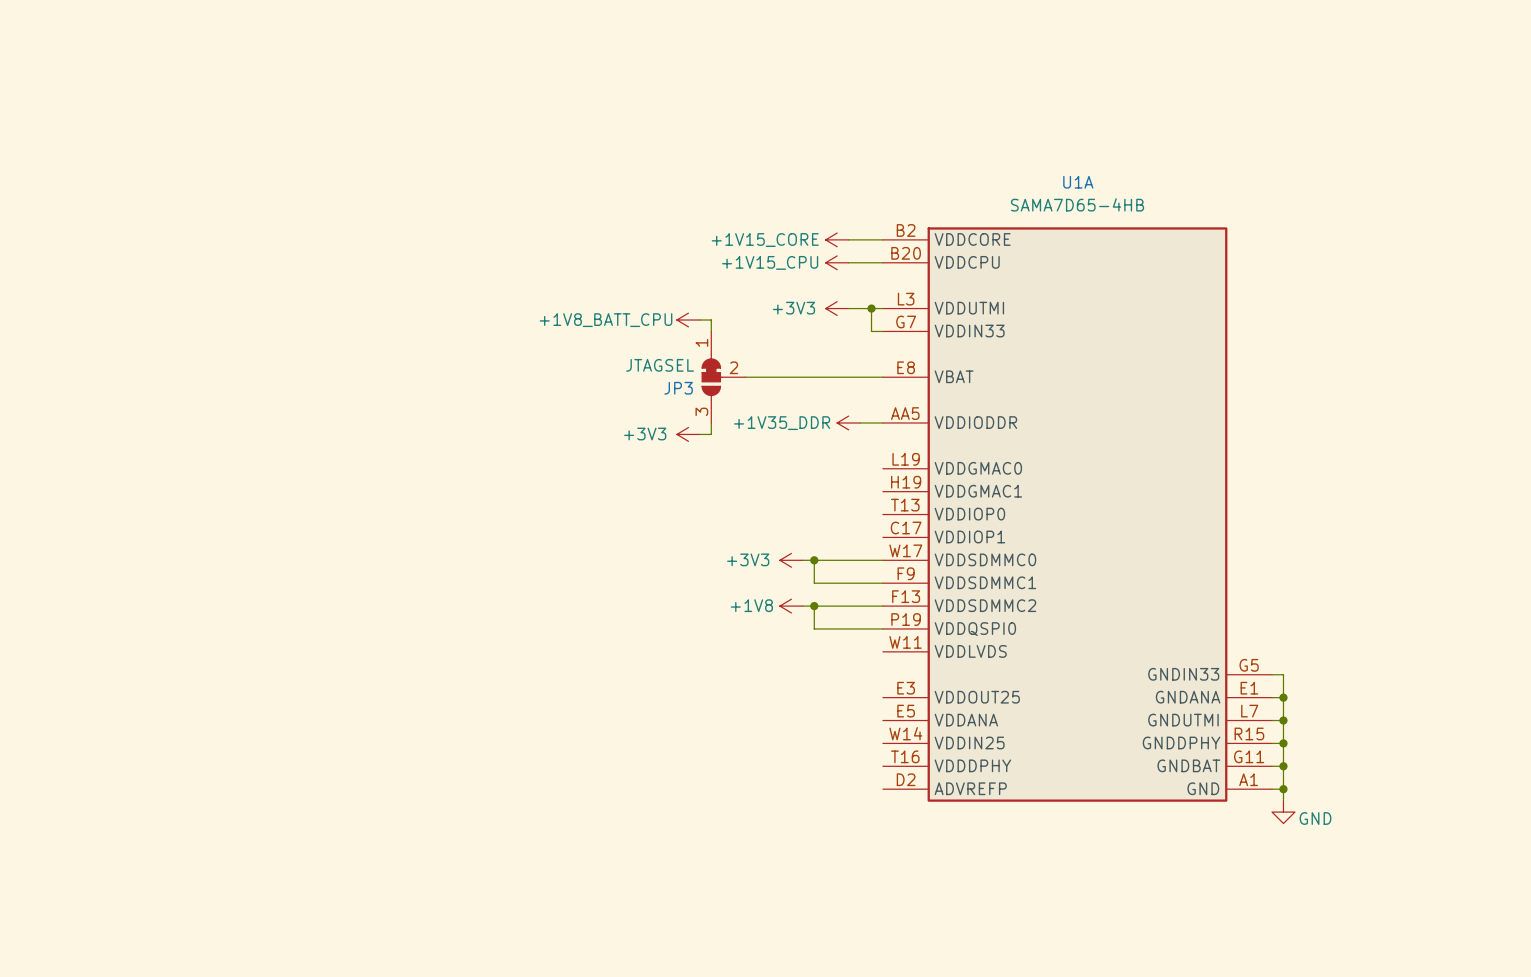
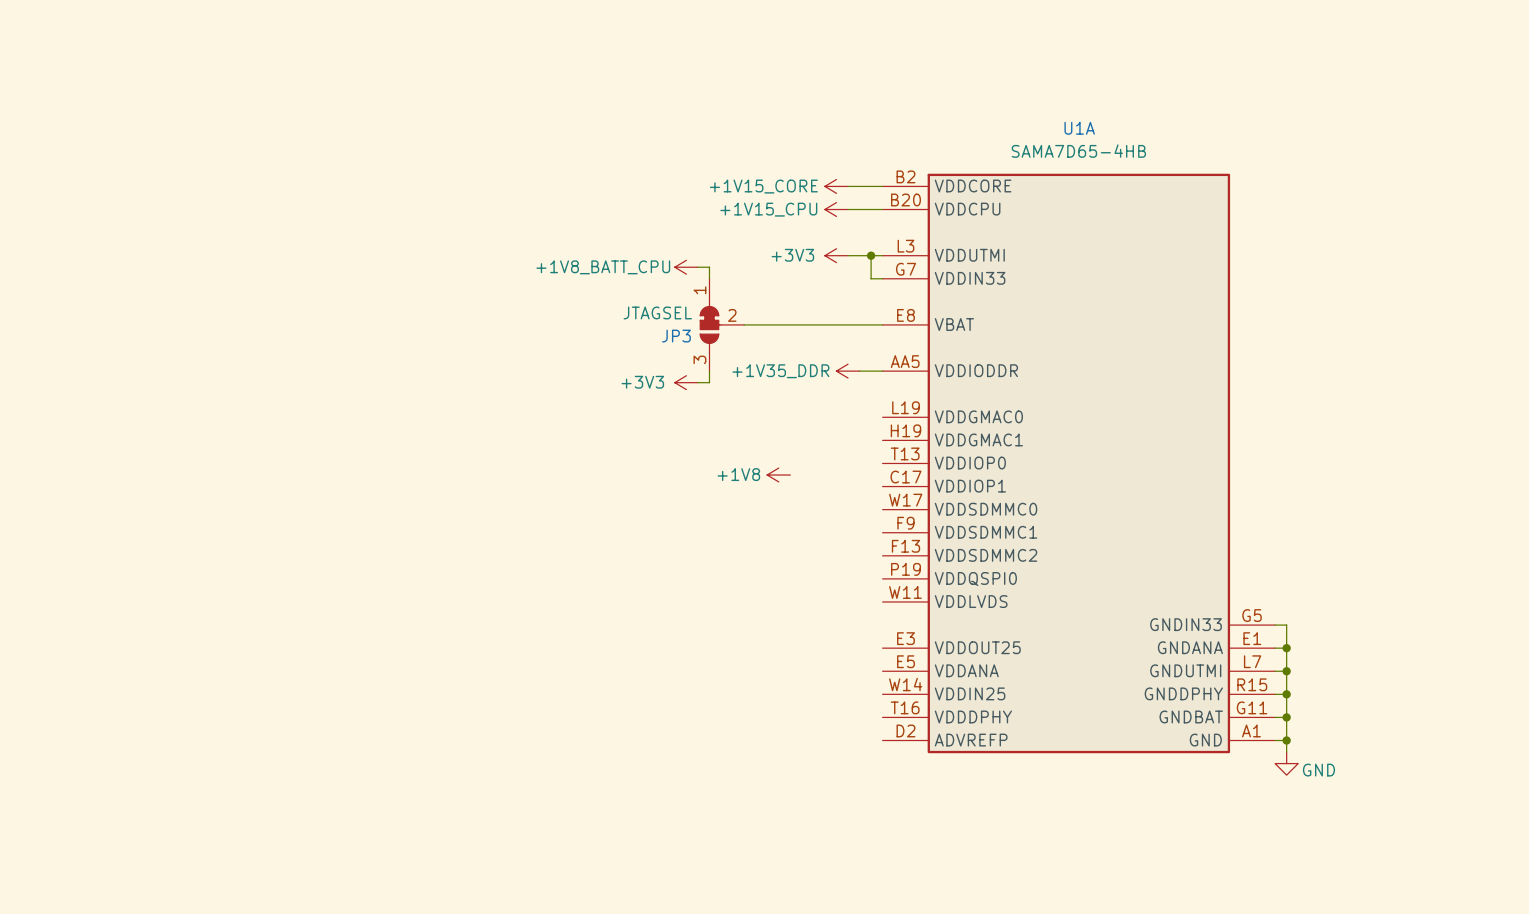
power symbol: +3V3 (791, 560) -> none
wire: (802, 560) (882, 560) -> none
wire: (814, 560) (814, 583) (882, 583) -> none
junction: (814, 560) -> none
power symbol position: +1V8 (791, 606) -> +1V8 (778, 475)
wire: (802, 606) (882, 606) -> none
wire: (814, 606) (814, 628) (882, 628) -> none
junction: (814, 606) -> none

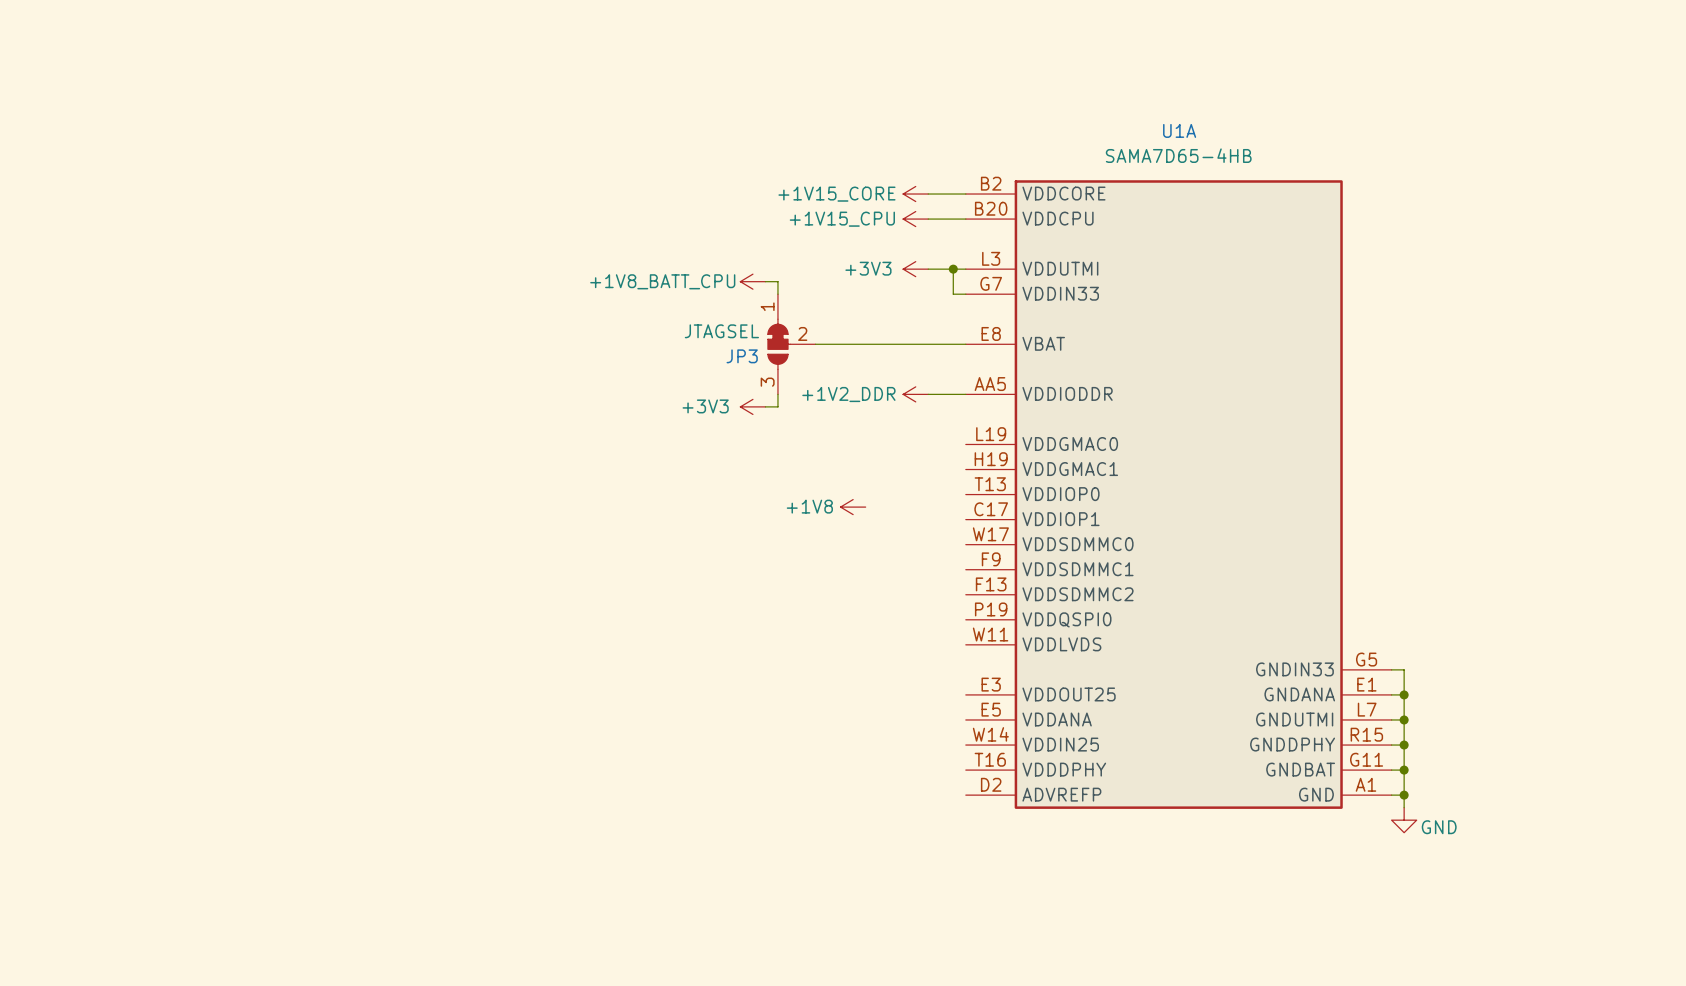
power symbol: none -> +1V2_DDR (915, 394)
power symbol: +1V35_DDR (848, 371) -> none

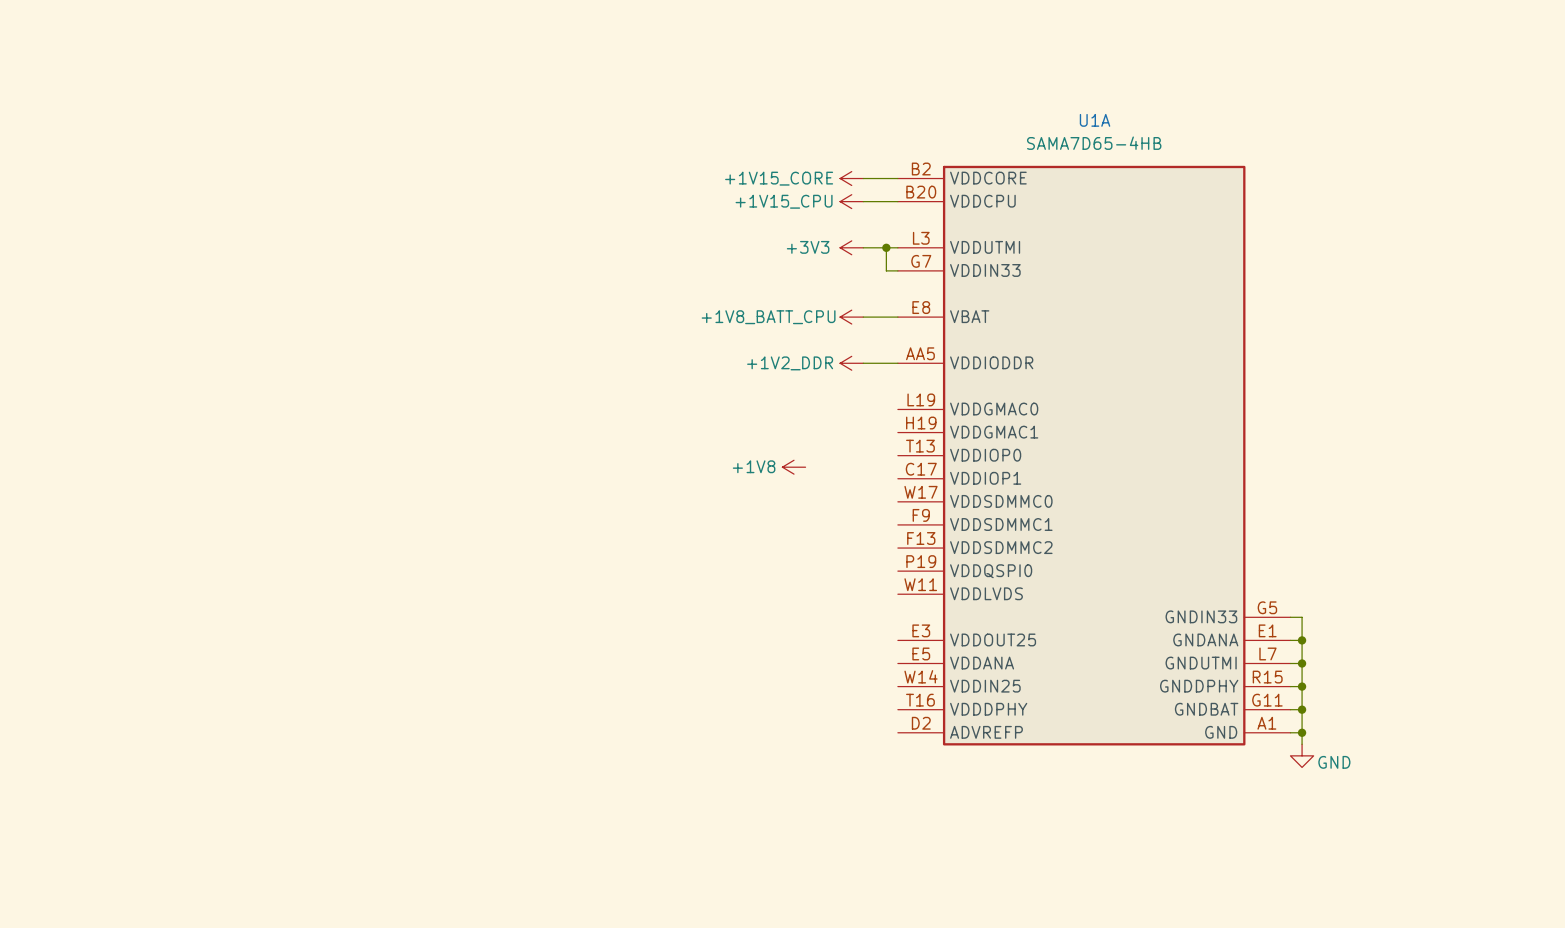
power symbol position: +1V8_BATT_CPU (752, 281) -> +1V8_BATT_CPU (851, 317)
wire: (765, 281) (777, 281) (777, 294) -> none
JP3: JTAGSEL (791, 344) -> none
wire: (815, 344) (928, 344) -> none
wire: (777, 394) (777, 406) (765, 406) -> none
power symbol: +3V3 (752, 406) -> none

